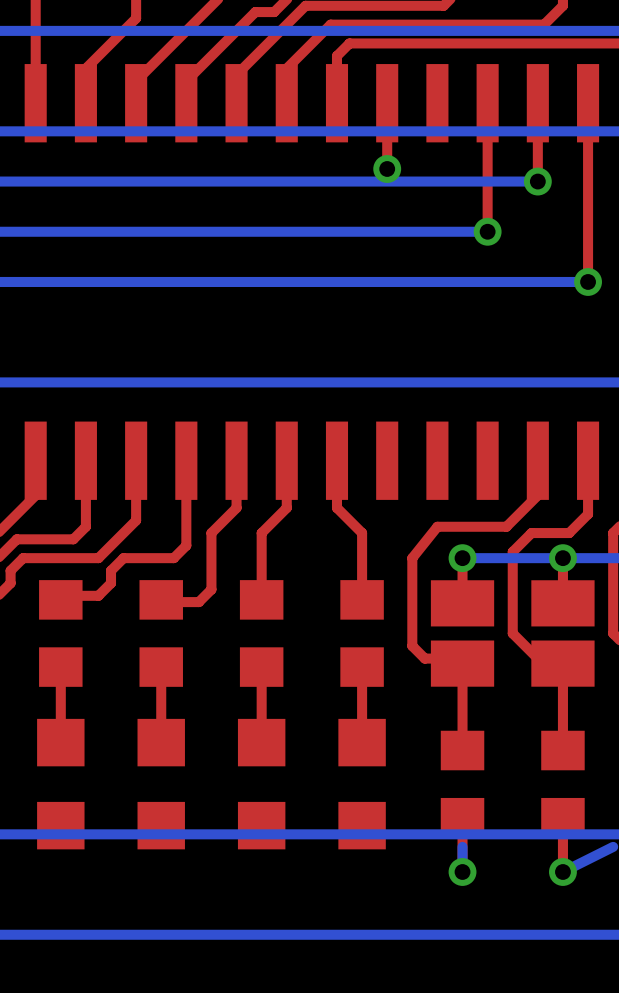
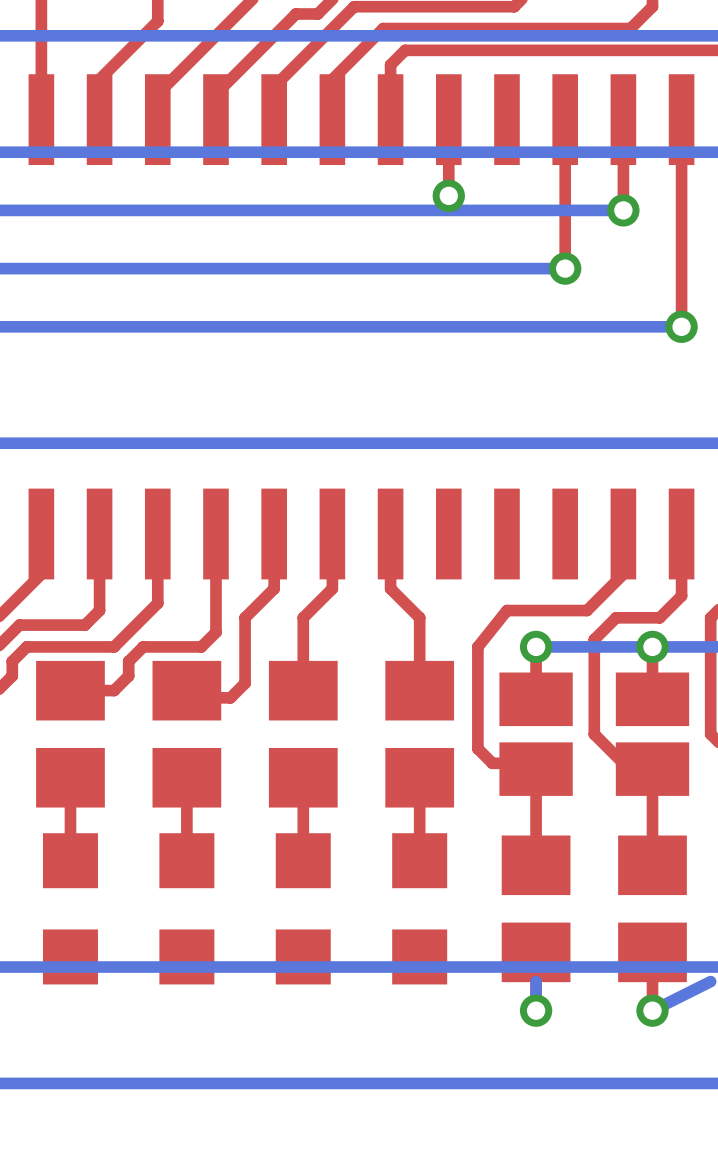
part footprint: [39, 580, 83, 687] -> [36, 660, 105, 808]
part footprint: [139, 580, 183, 687] -> [152, 660, 222, 808]
part footprint: [239, 580, 284, 687] -> [268, 660, 338, 808]
part footprint: [340, 580, 384, 687] -> [385, 660, 455, 808]
part footprint: [440, 730, 485, 838] -> [501, 835, 571, 983]
part footprint: [541, 730, 585, 838] -> [618, 835, 687, 983]

